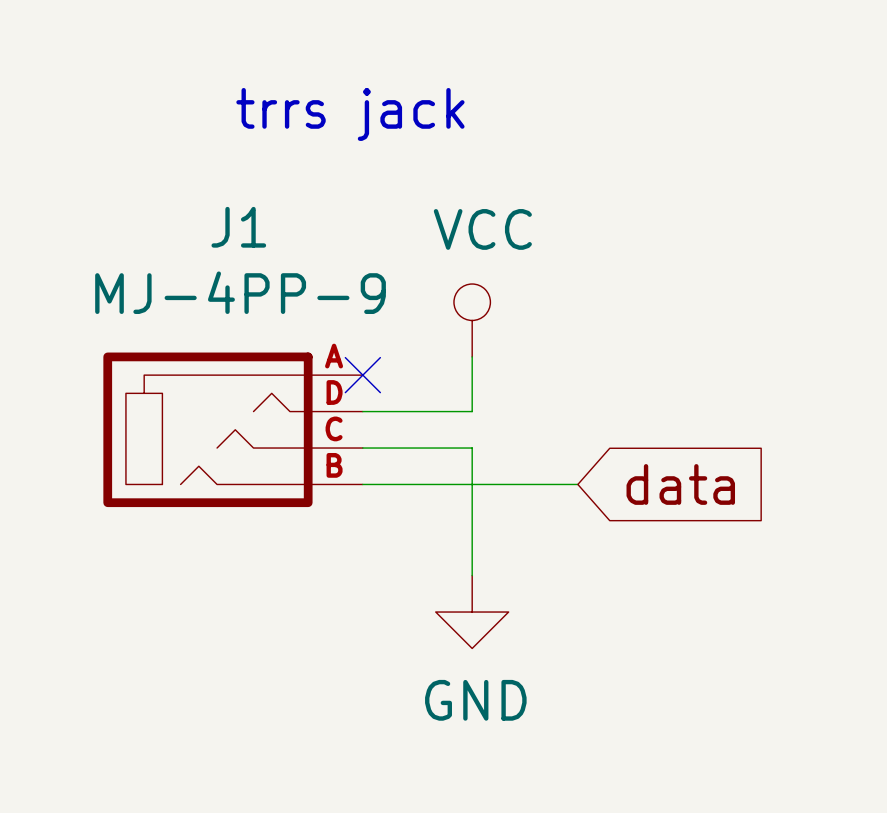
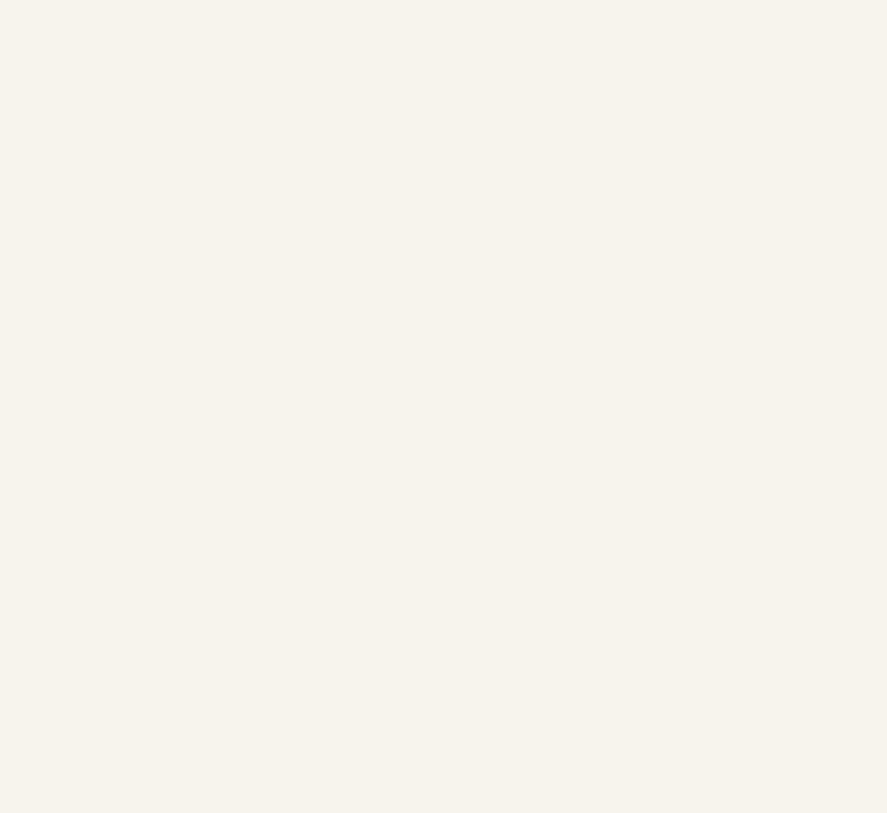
text: trrs jack (350, 114) -> none
power symbol: VCC (472, 320) -> none
wire: (472, 356) (472, 411) (362, 411) -> none
no-connect mark: (362, 375) -> none
J1: MJ-4PP-9 (233, 429) -> none
wire: (362, 448) (472, 448) (472, 575) -> none
wire: (362, 484) (577, 484) -> none
global label: data (680, 484) -> none
power symbol: GND (472, 612) -> none

